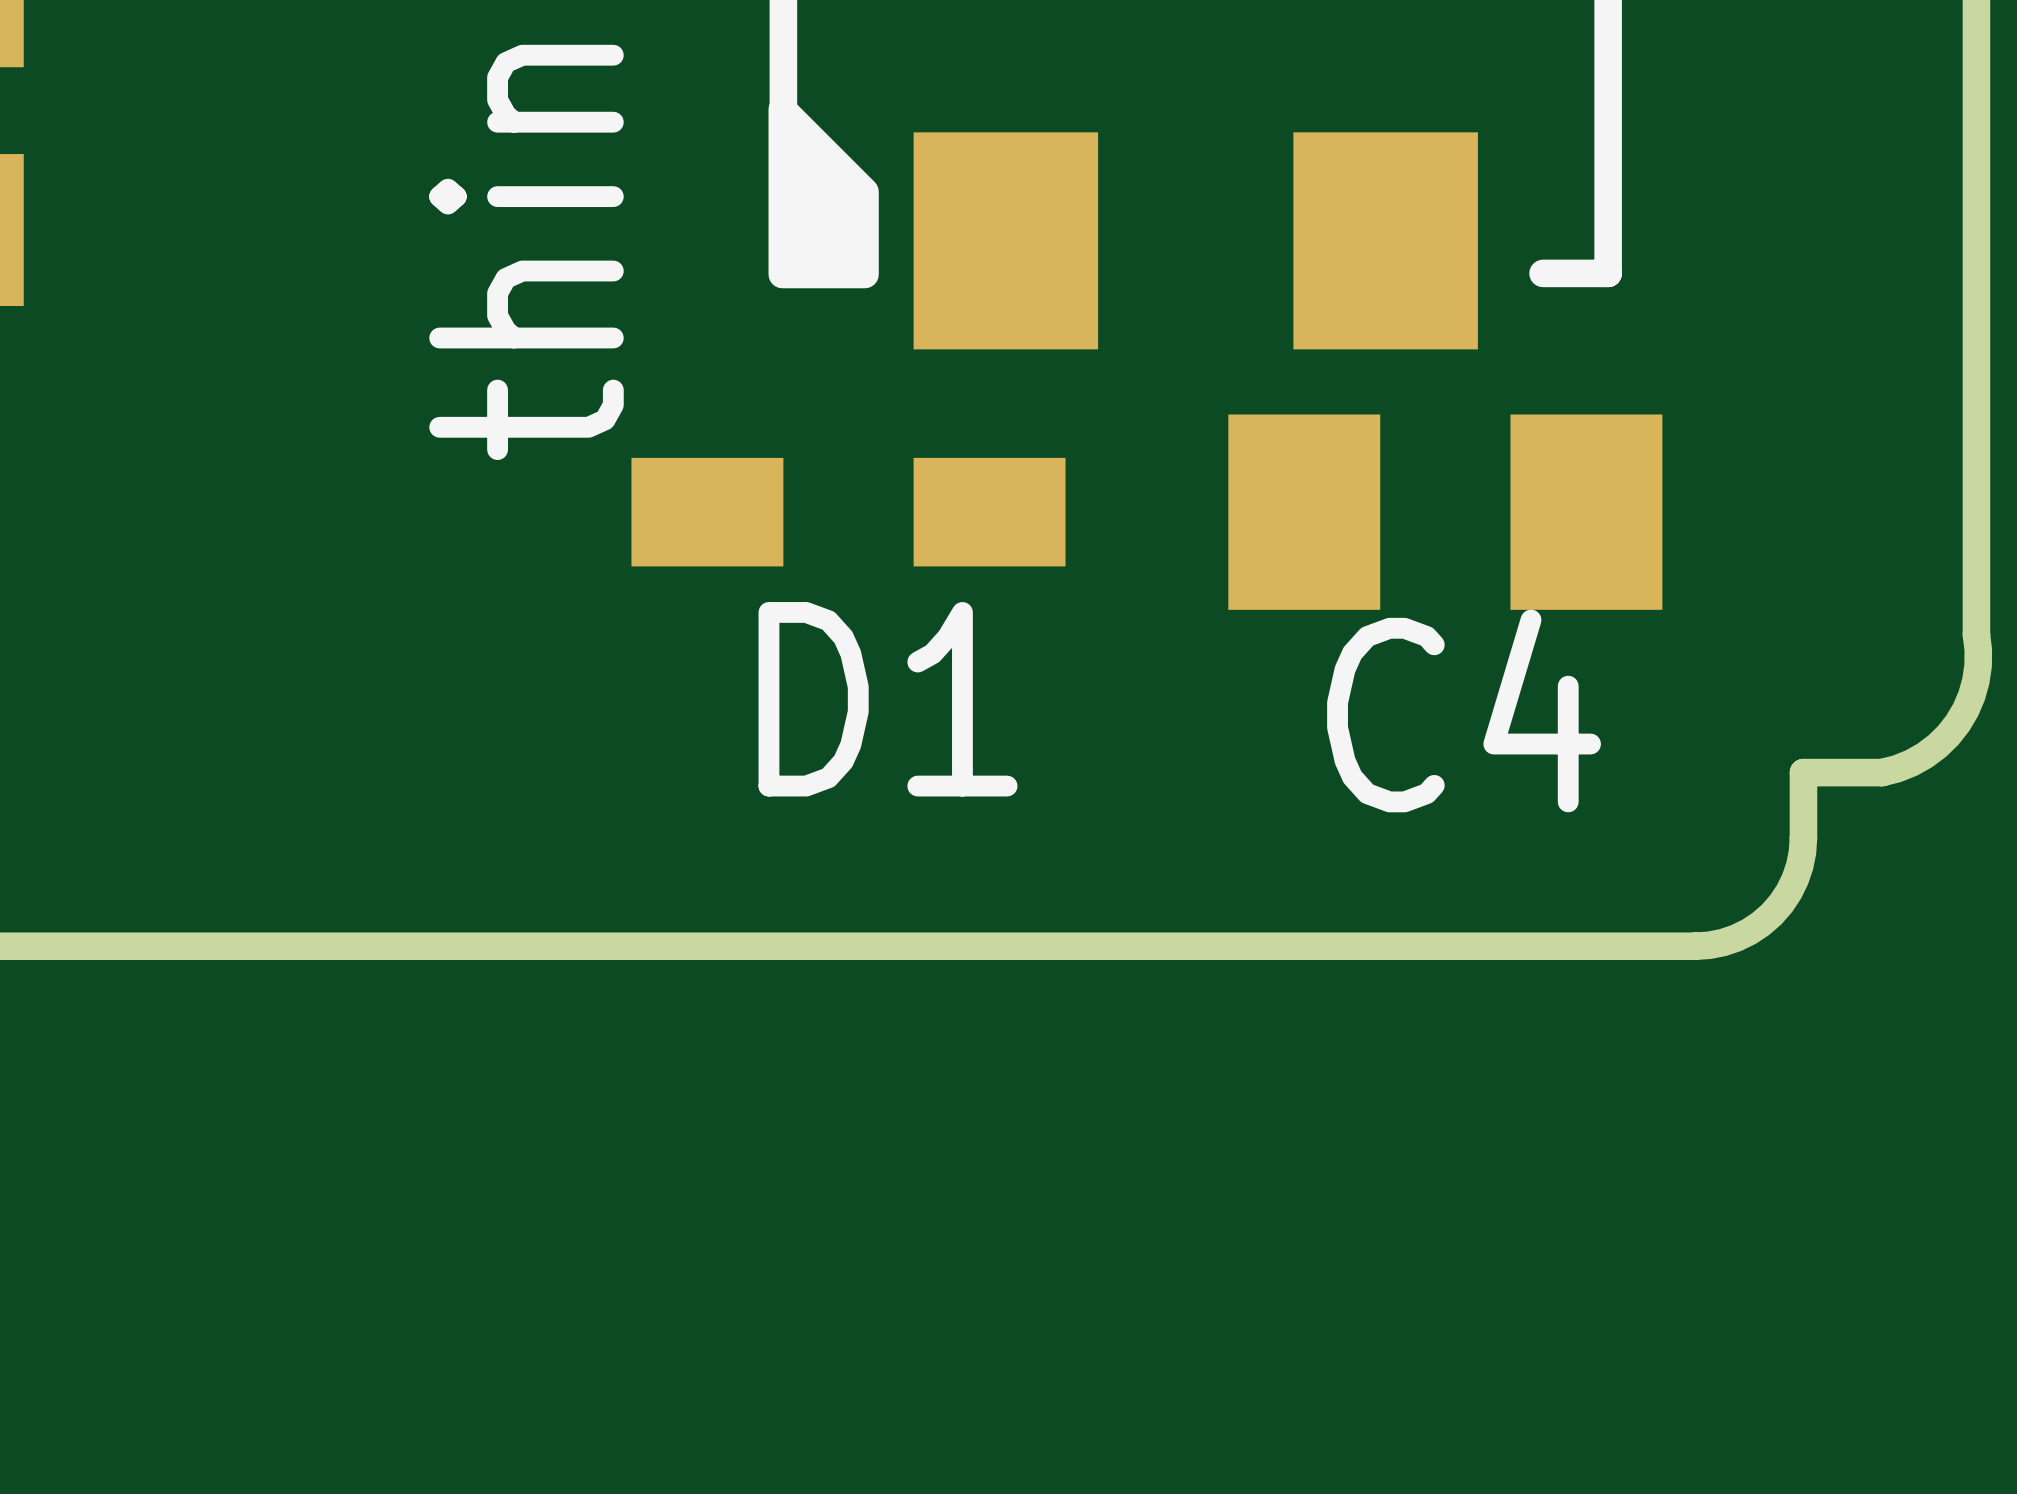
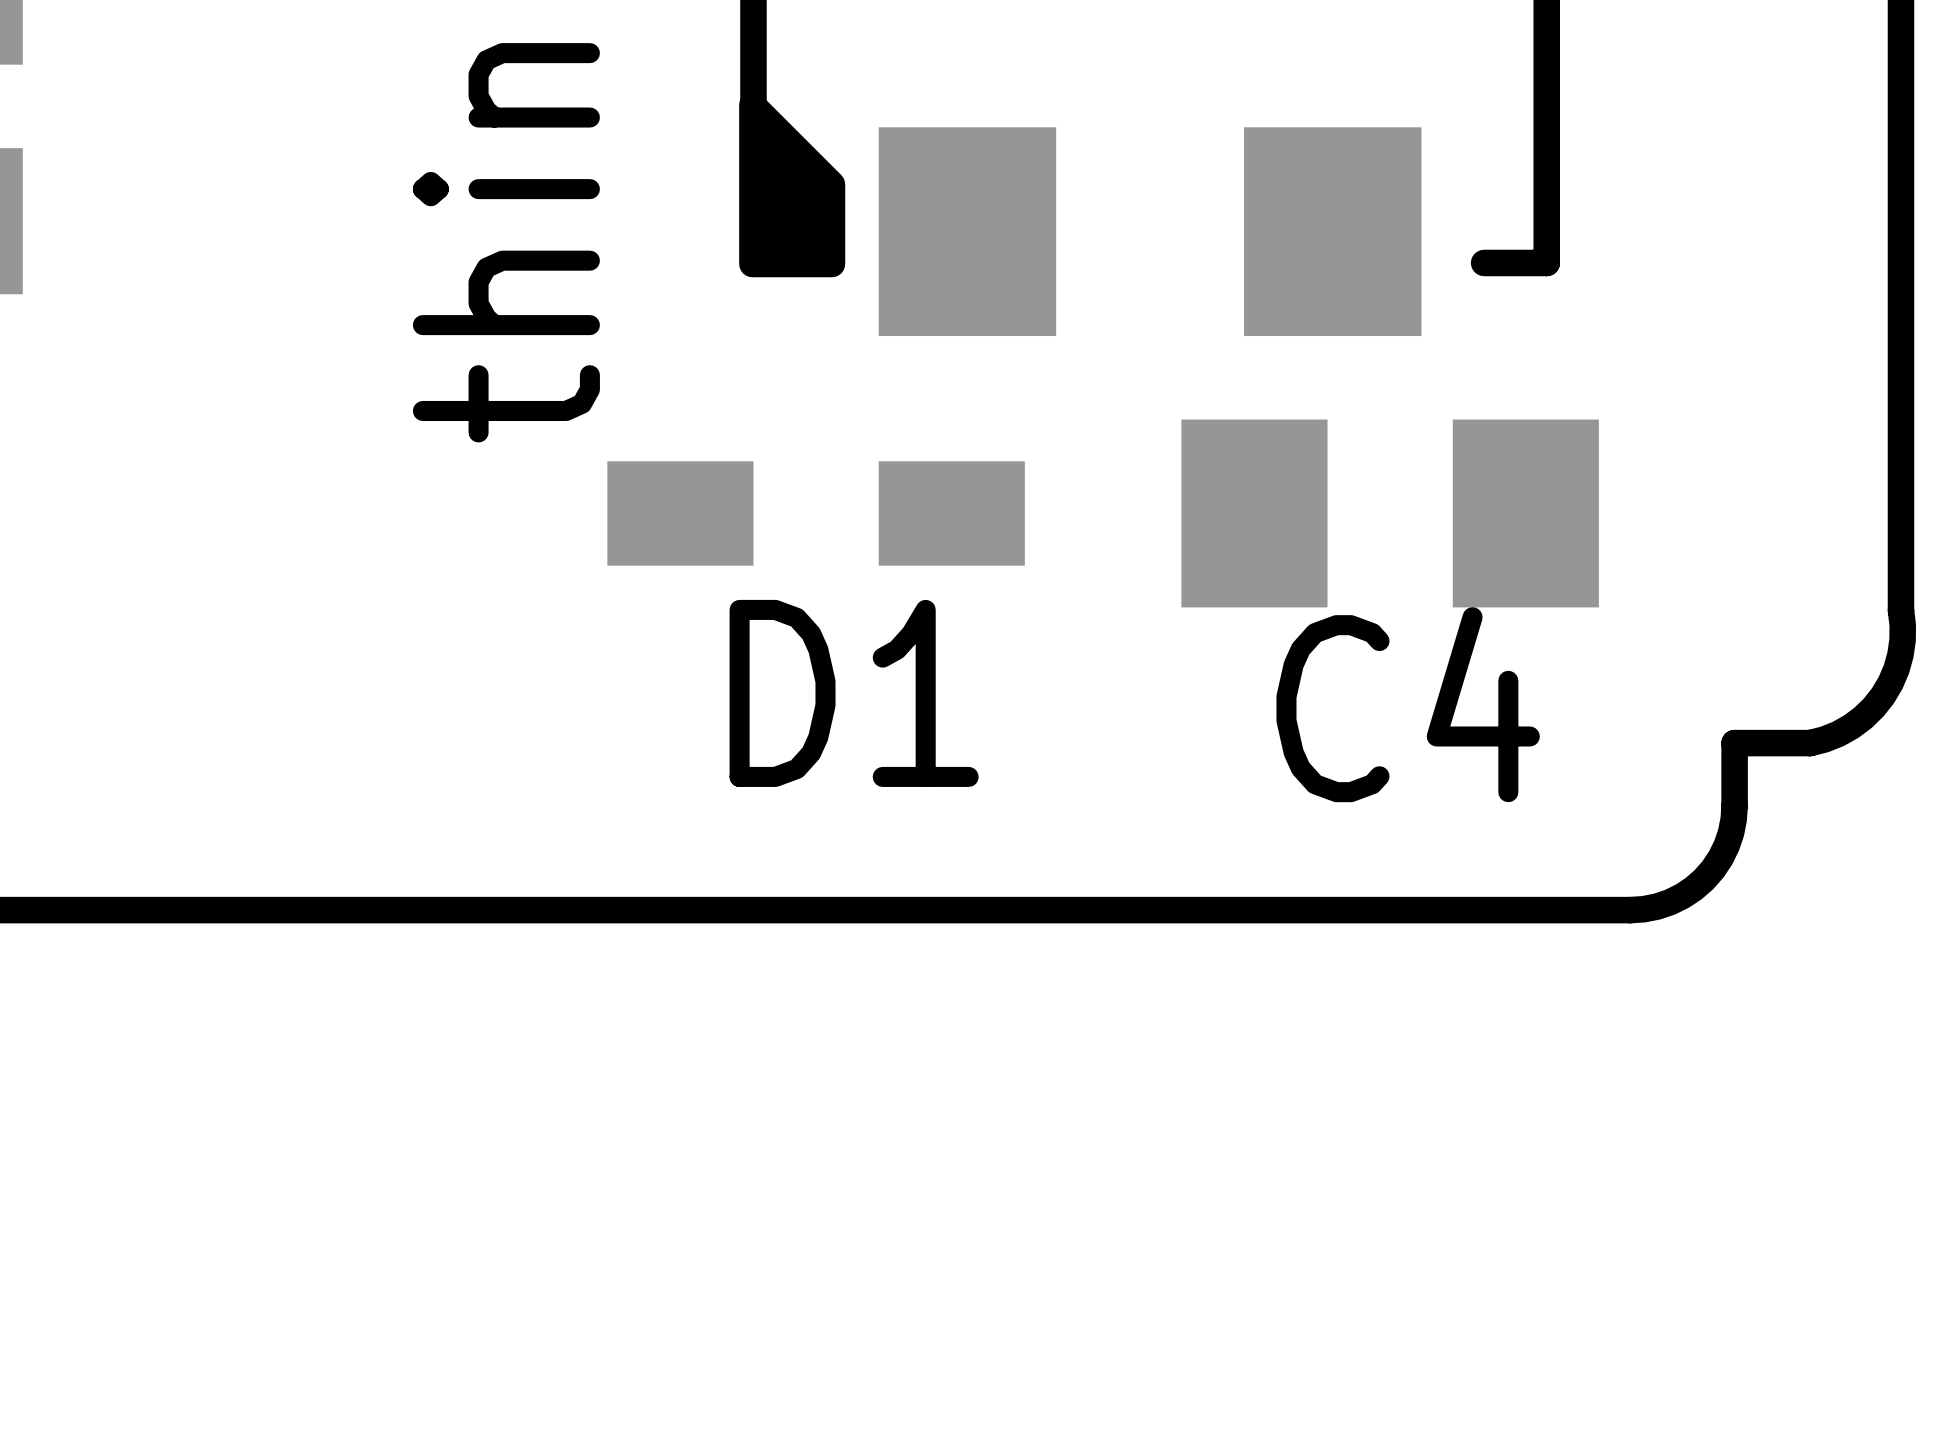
D1 position: (848, 512) -> (816, 513)
C4 position: (1445, 512) -> (1390, 513)

